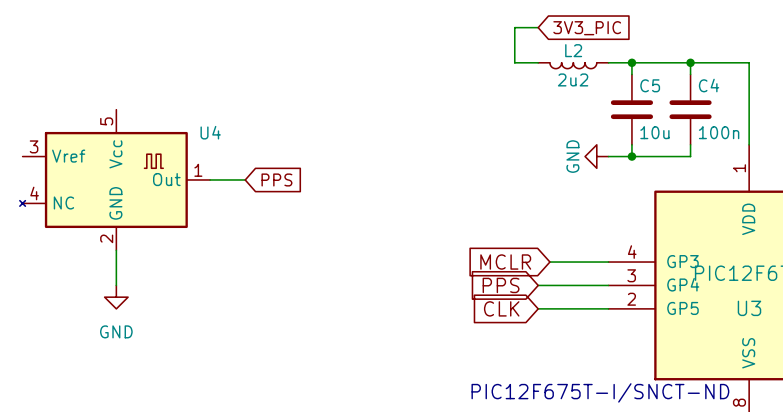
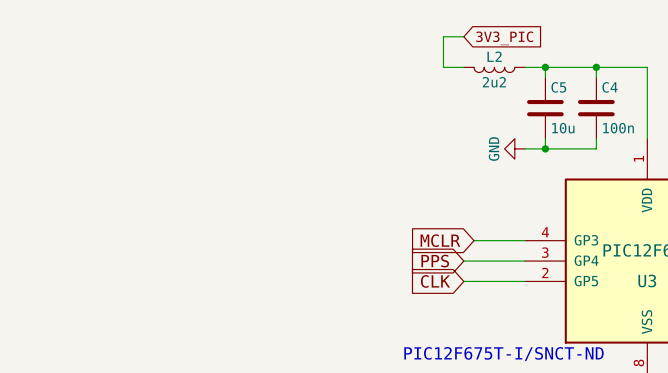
U4: (114, 179) -> none
wire: (210, 179) (245, 179) -> none
global label: PPS (276, 179) -> none
wire: (116, 250) (116, 285) -> none
power symbol: GND (116, 297) -> none

